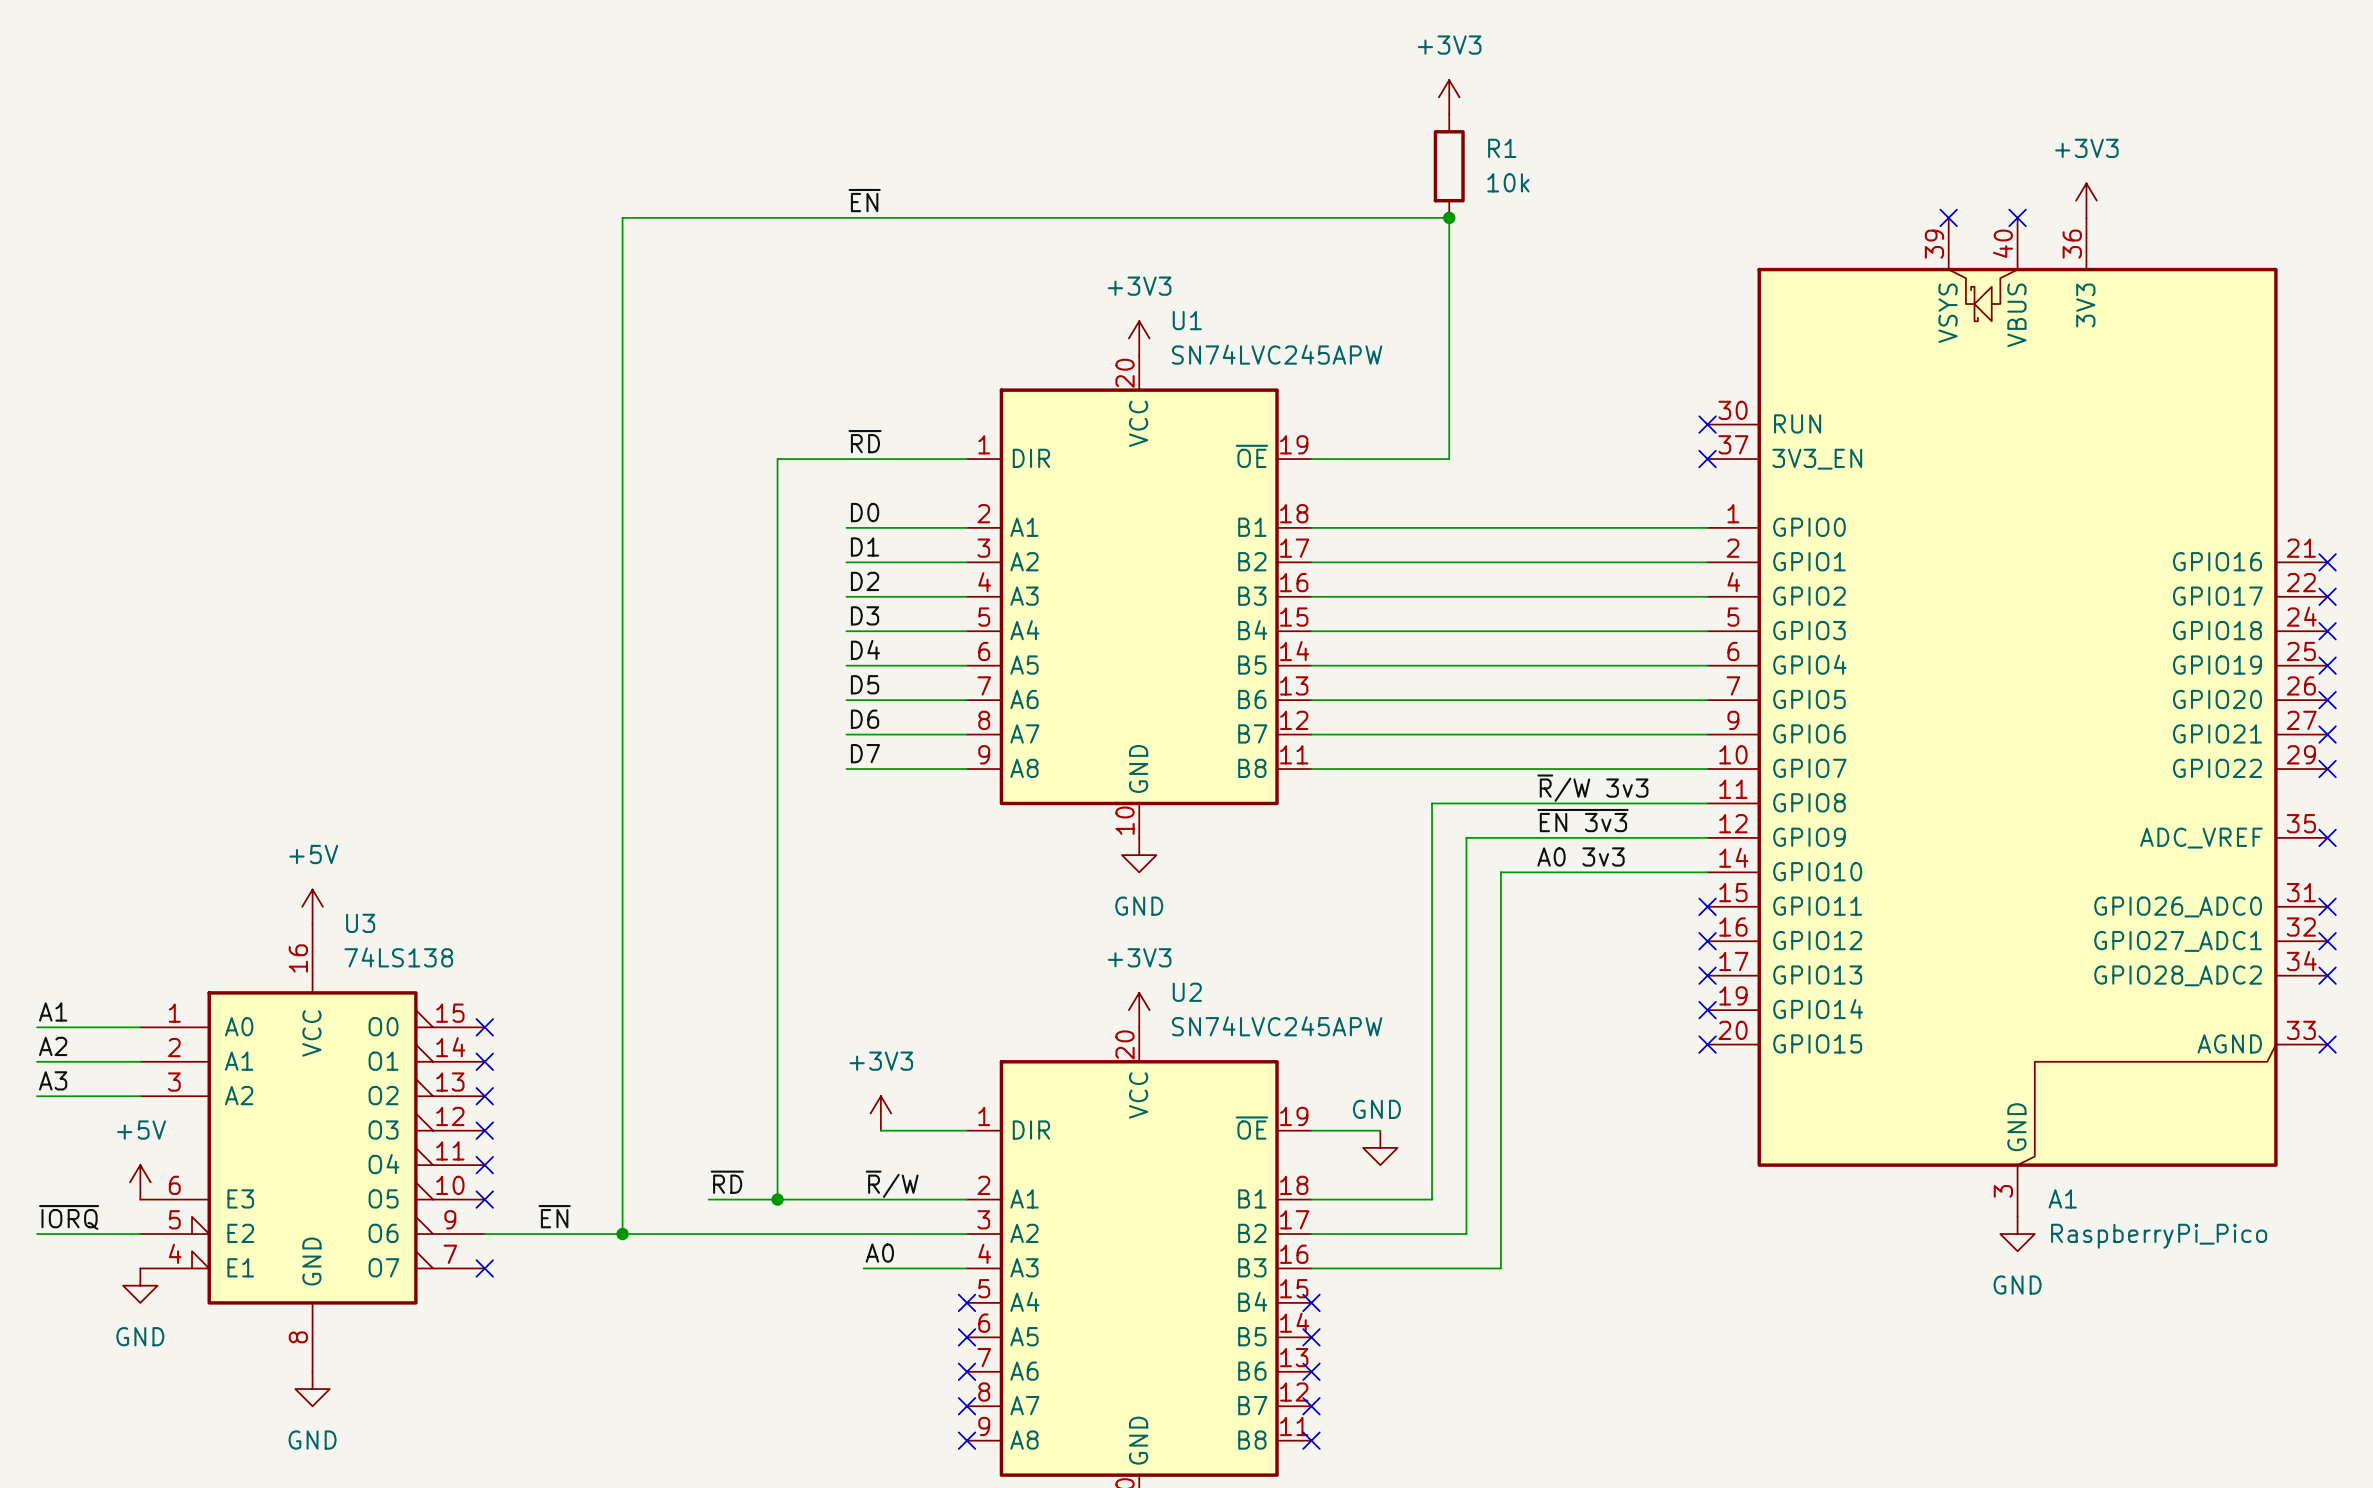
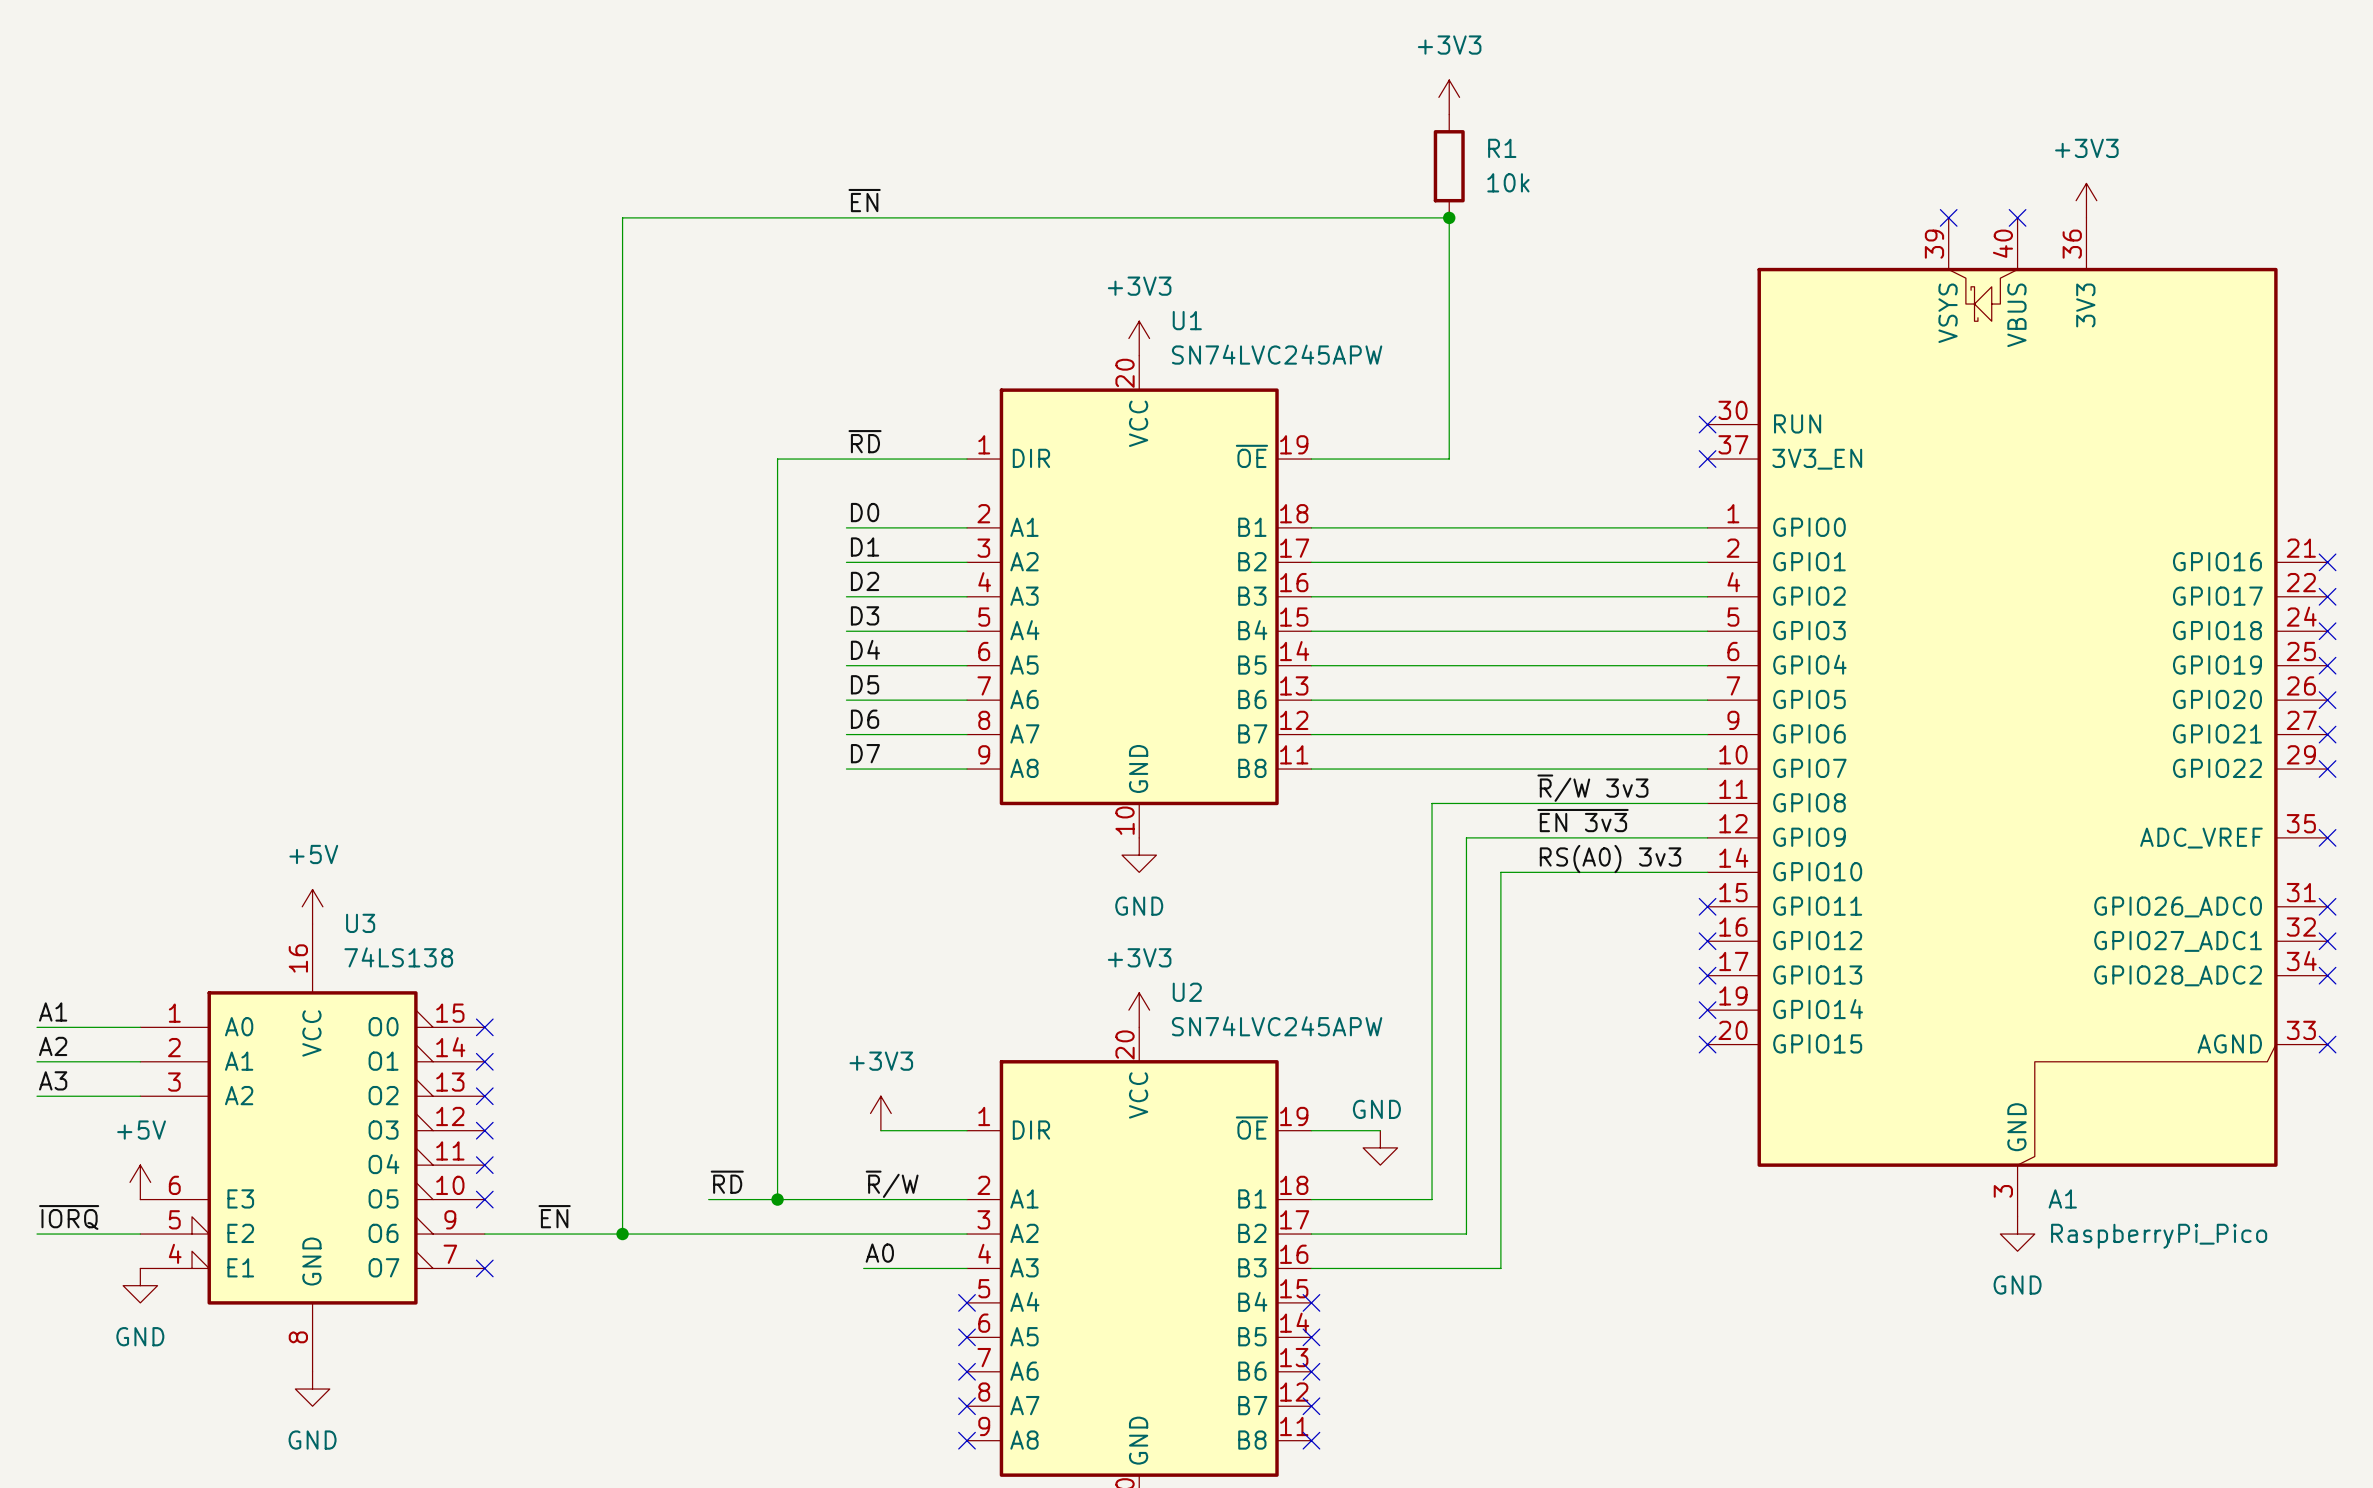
label: A0 3v3 (1580, 856) -> RS(A0) 3v3 (1610, 859)

